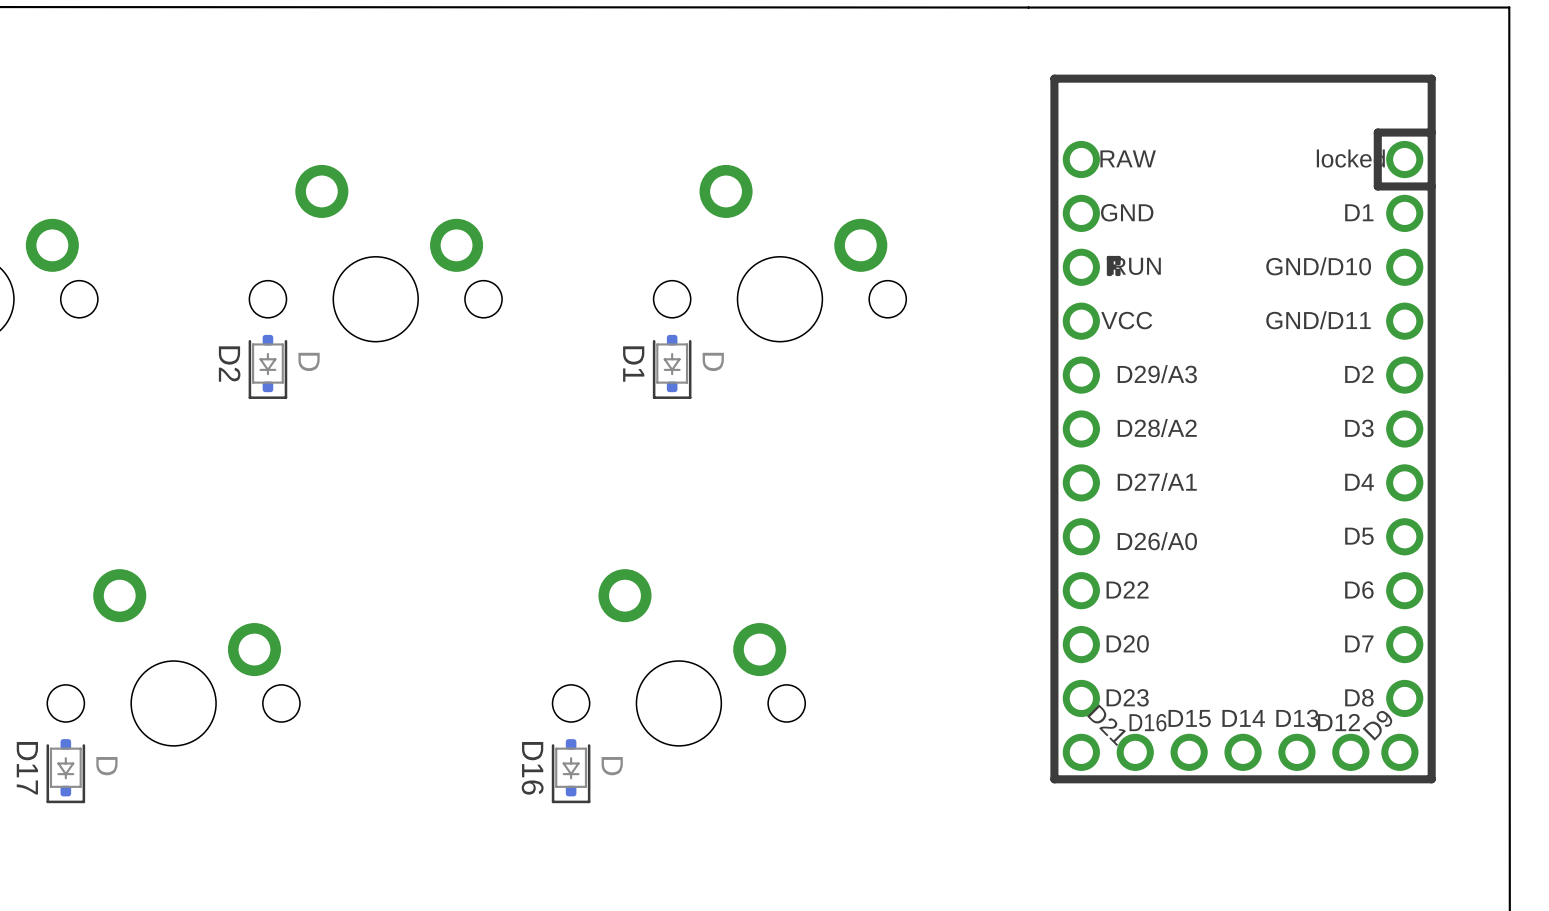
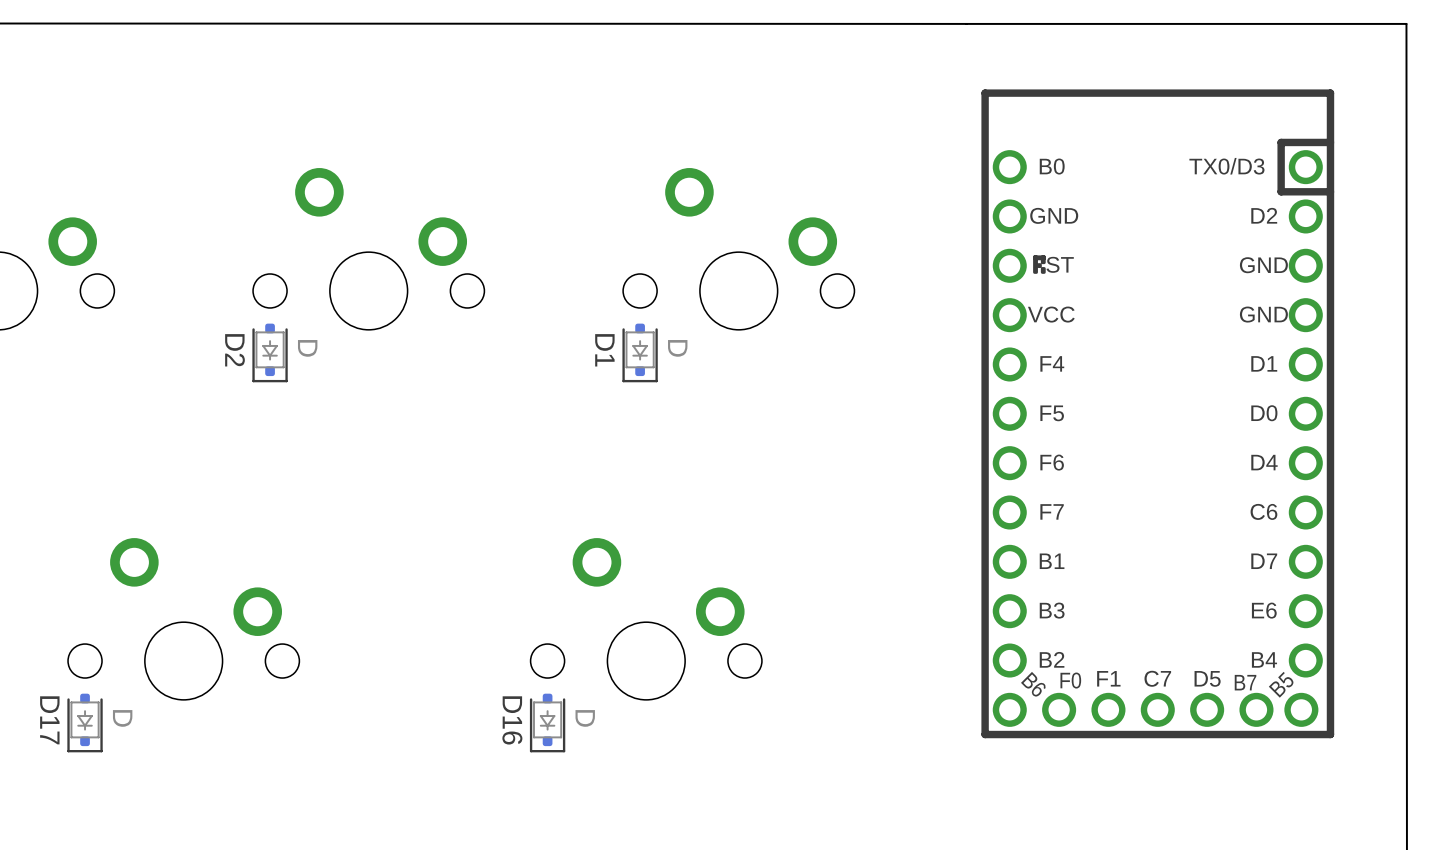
part footprint: [1050, 74, 1436, 784] -> [981, 89, 1335, 739]

